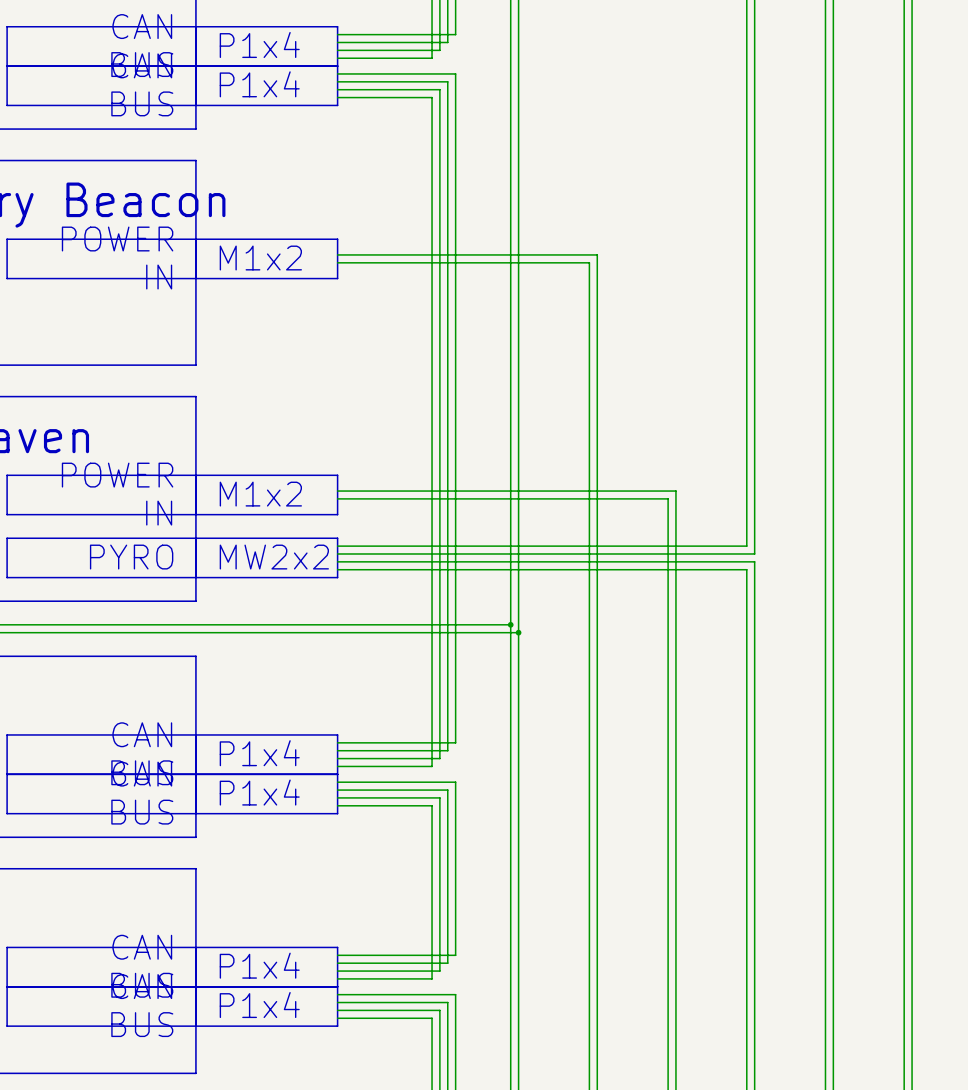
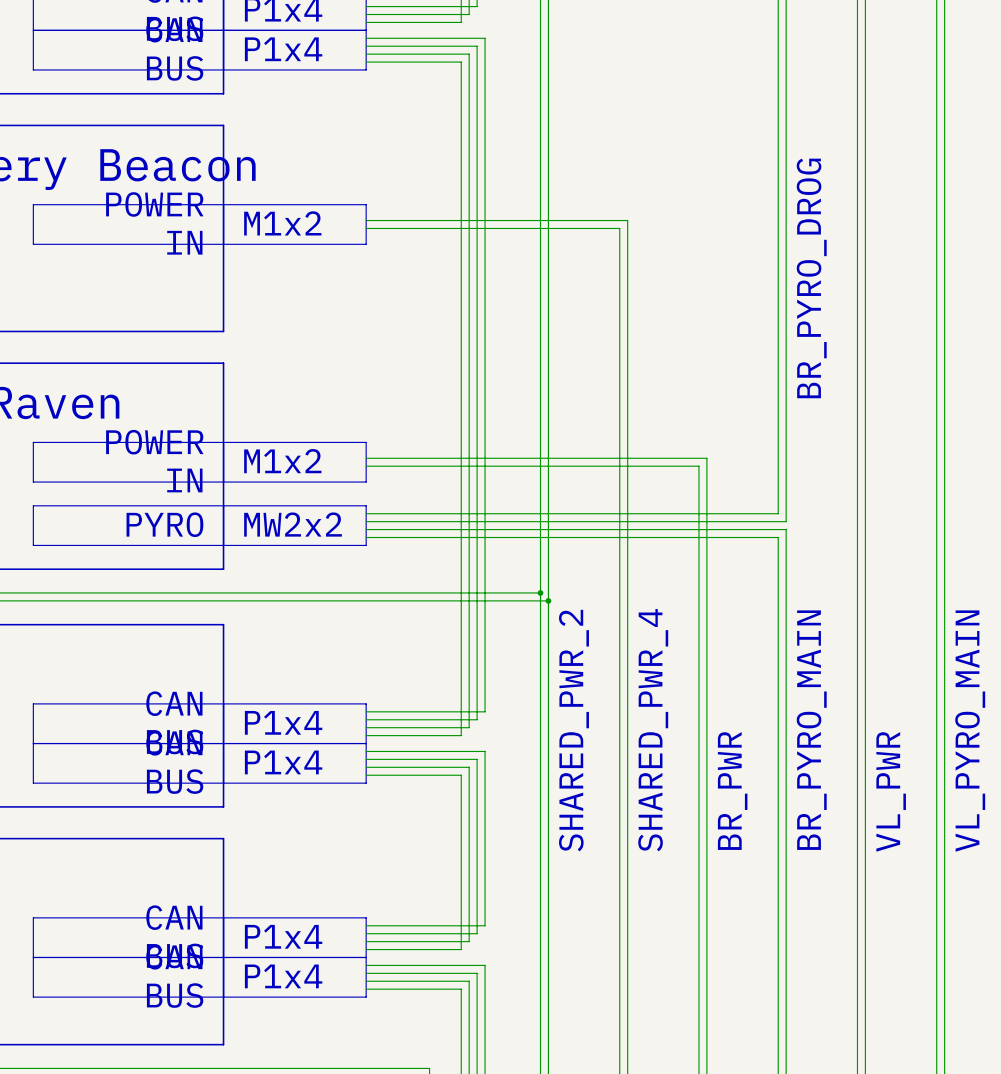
text: none -> BR_PYRO_DROG (811, 278)
text: none -> SHARED_PWR_2 (573, 730)
text: none -> SHARED_PWR_4 (653, 730)
text: none -> BR_PYRO_MAIN (811, 730)
text: none -> VL_PYRO_MAIN (970, 731)
text: none -> BR_PWR (732, 790)
text: none -> VL_PWR (891, 791)

